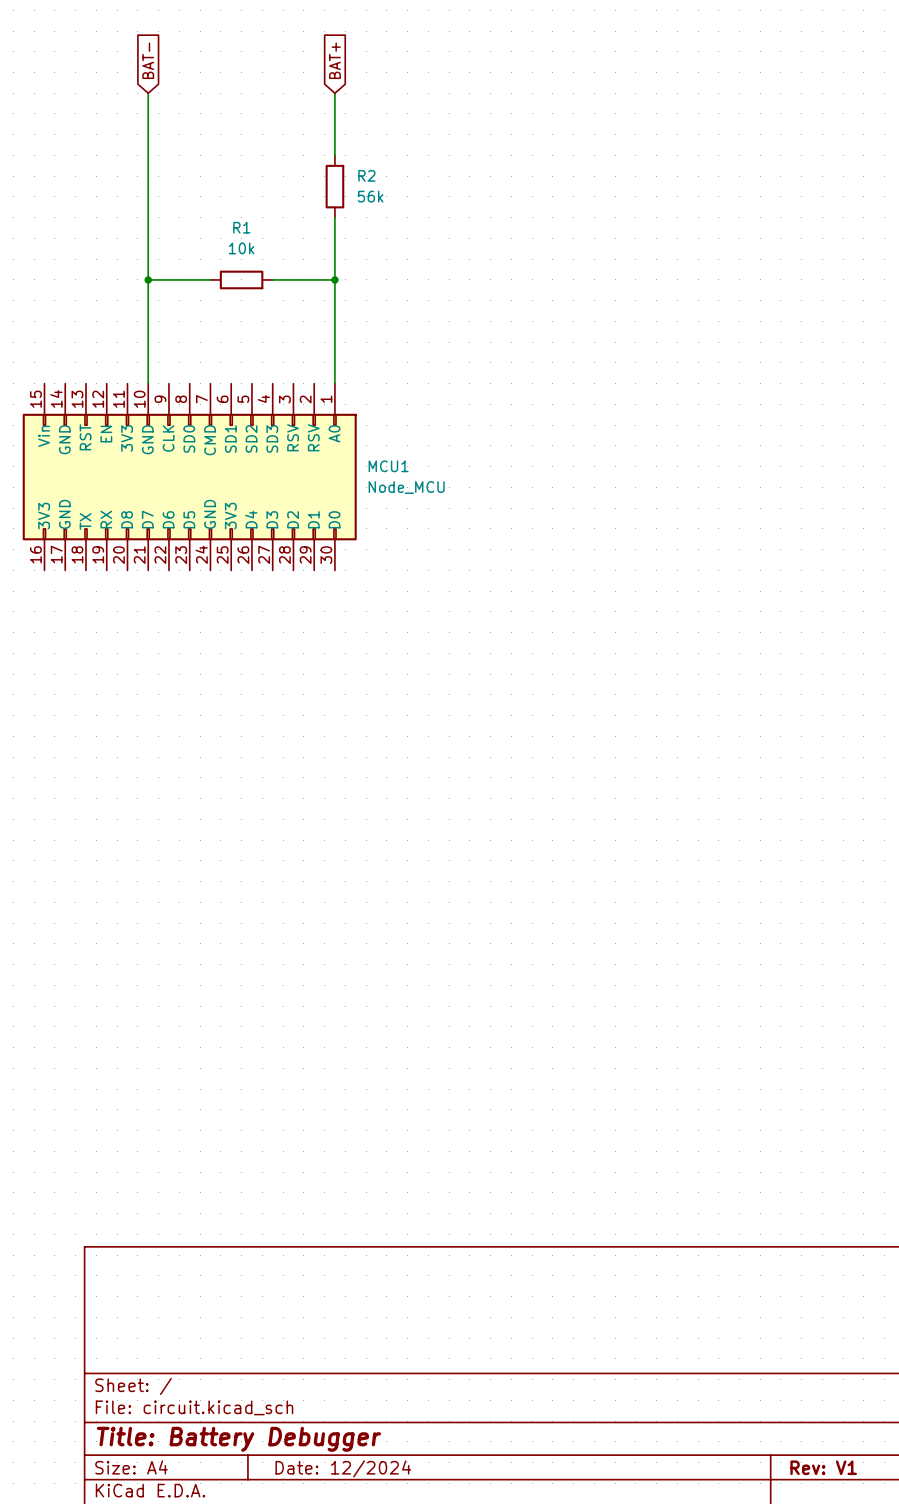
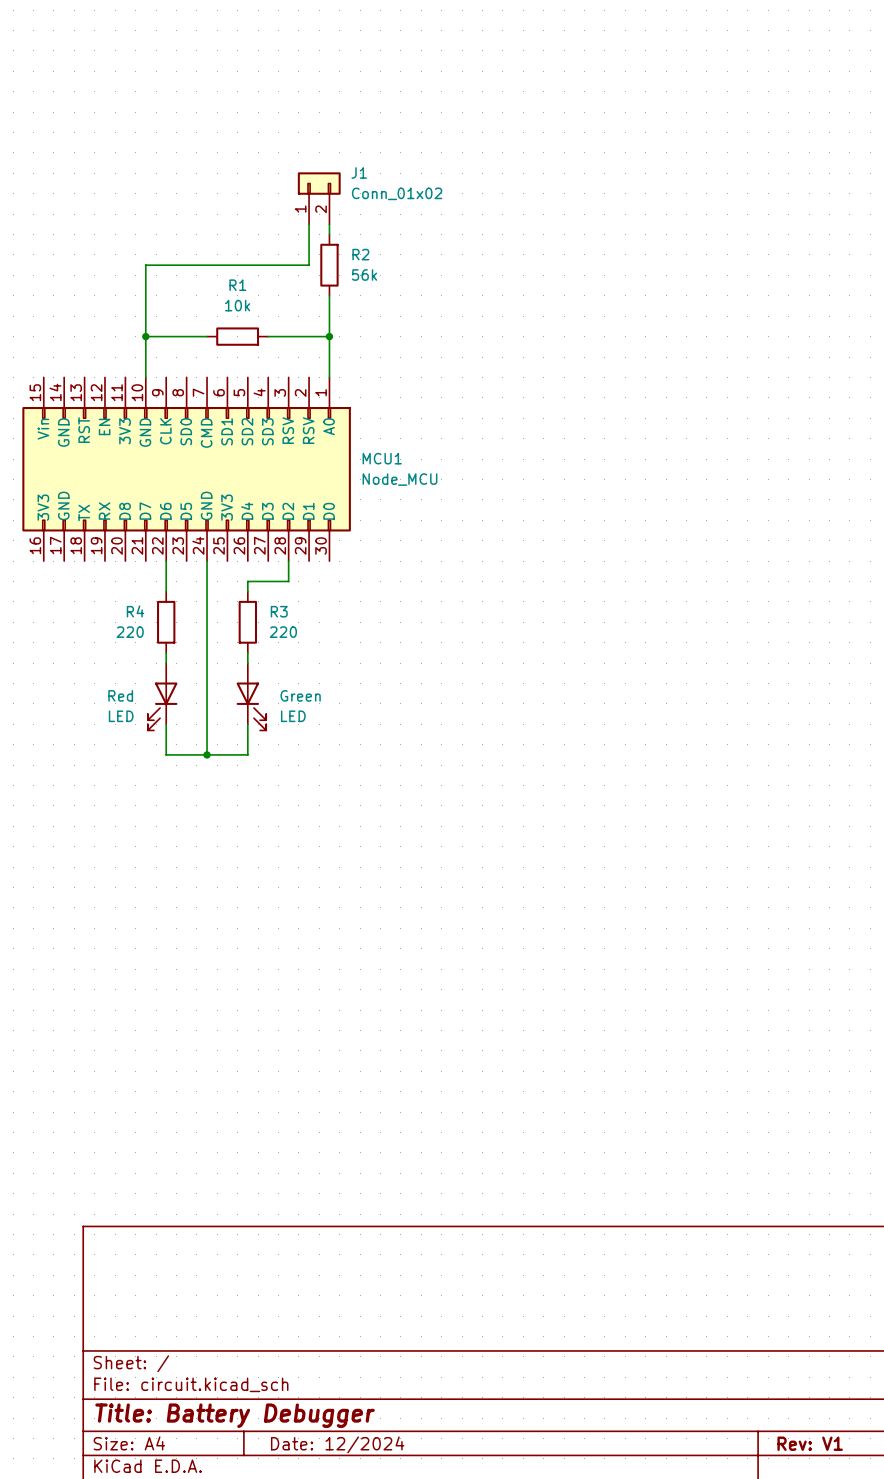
global label: BAT- (148, 60) -> none
global label: BAT+ (334, 60) -> none
wire: (148, 93) (148, 269) -> (309, 224) (309, 265) (145, 265)
wire: (334, 93) (334, 155) -> none
R2 position: (334, 186) -> (329, 265)
J1: none -> Conn_01x02 (319, 198)
wire: (334, 238) (334, 300) -> none
wire: (148, 279) (210, 279) -> (145, 336) (207, 336)
junction: (148, 279) -> none
R1 position: (241, 279) -> (237, 336)
wire: (272, 279) (334, 279) -> (268, 336) (329, 336)
junction: (334, 279) -> none
junction: none -> (145, 336)
junction: none -> (329, 336)
wire: none -> (166, 561) (166, 591)
wire: none -> (207, 561) (207, 754)
wire: none -> (288, 561) (288, 581) (247, 581) (247, 591)
R4: none -> 220 (166, 622)
R3: none -> 220 (247, 622)
wire: none -> (166, 652) (166, 663)
wire: none -> (247, 652) (247, 663)
Red: none -> LED (162, 696)
Green: none -> LED (251, 696)
wire: none -> (166, 724) (166, 754) (247, 754) (247, 724)
junction: none -> (207, 754)

